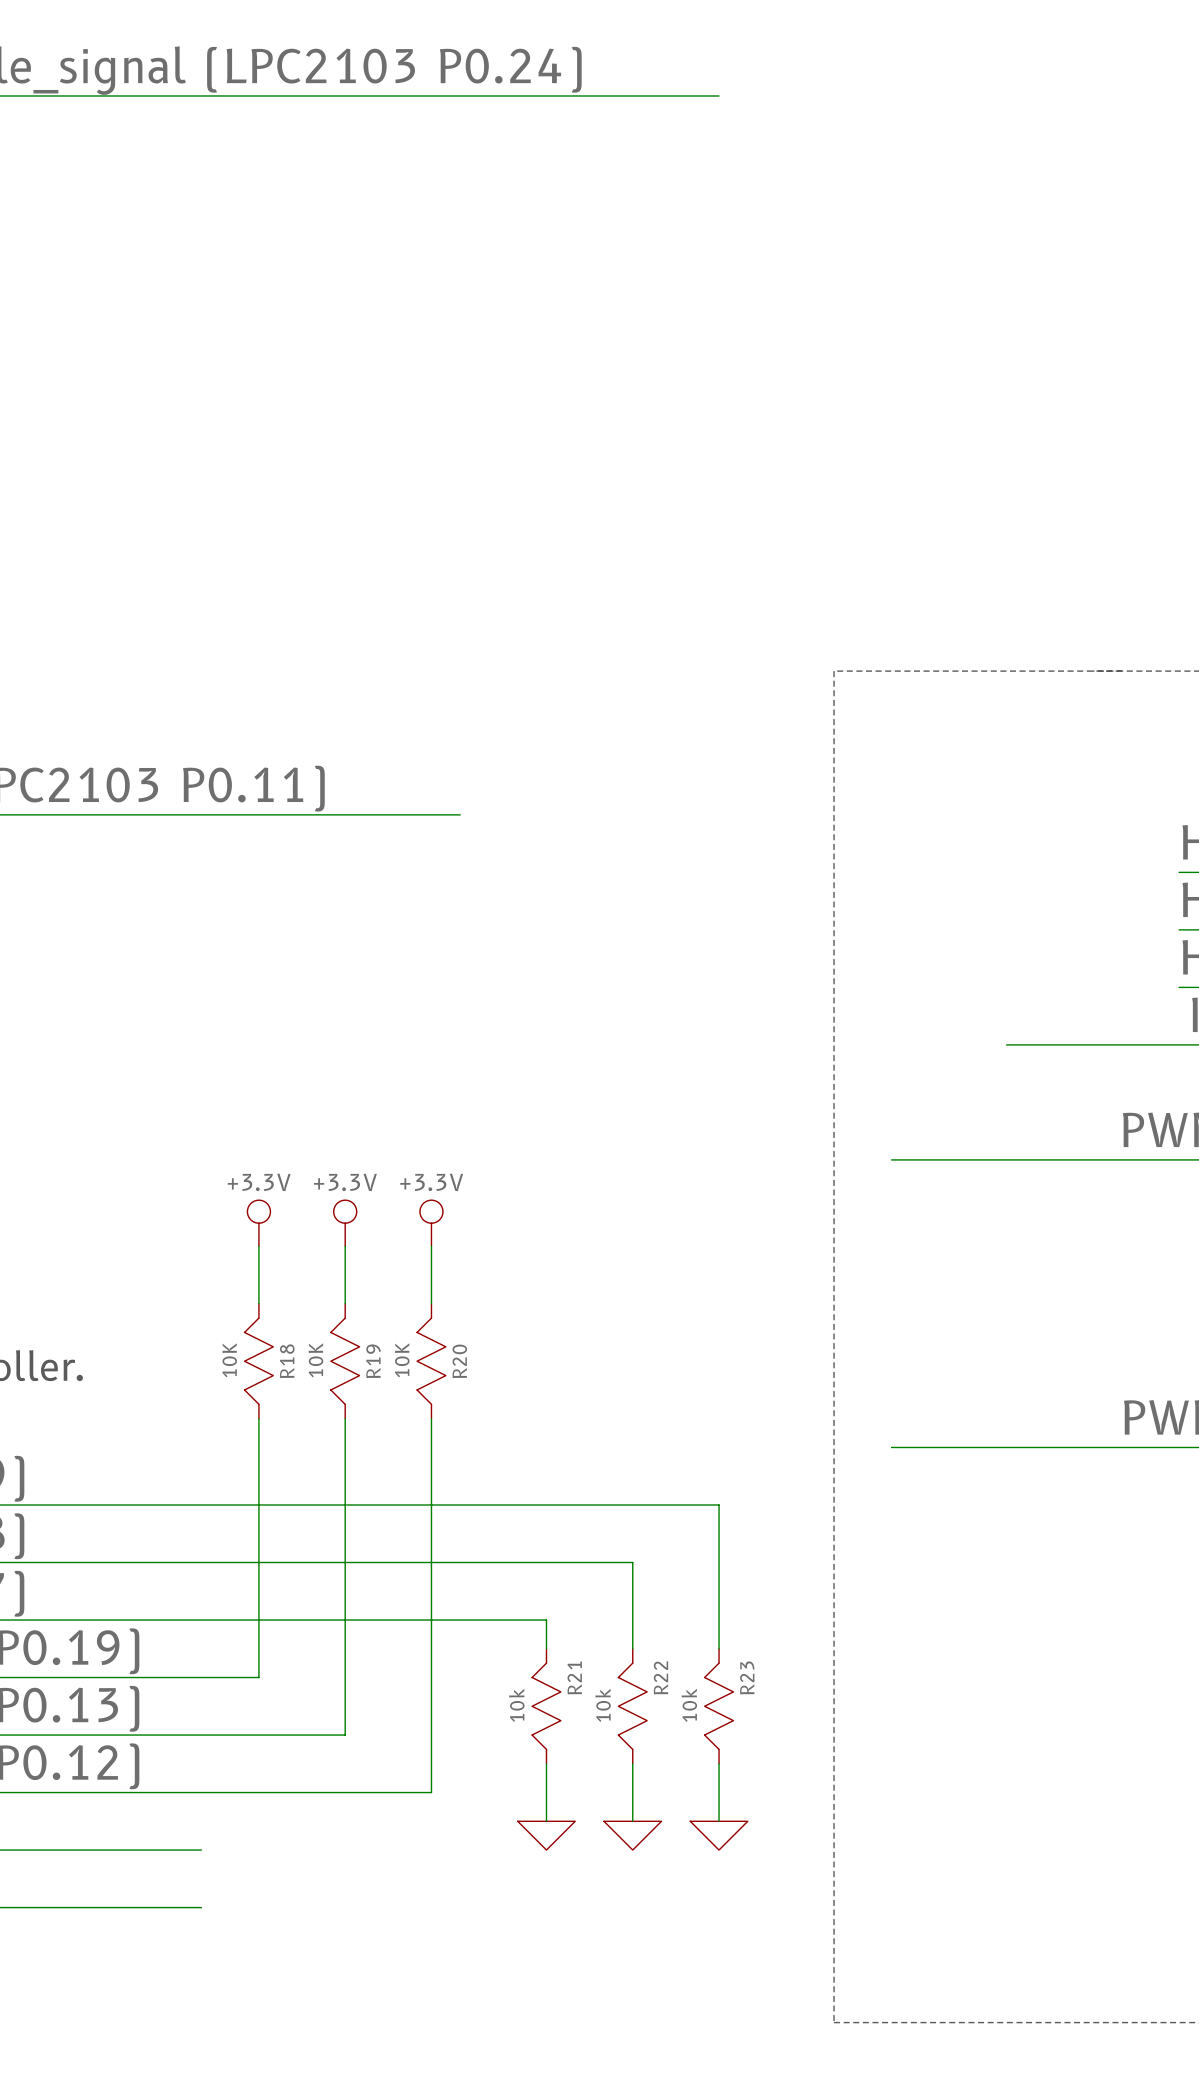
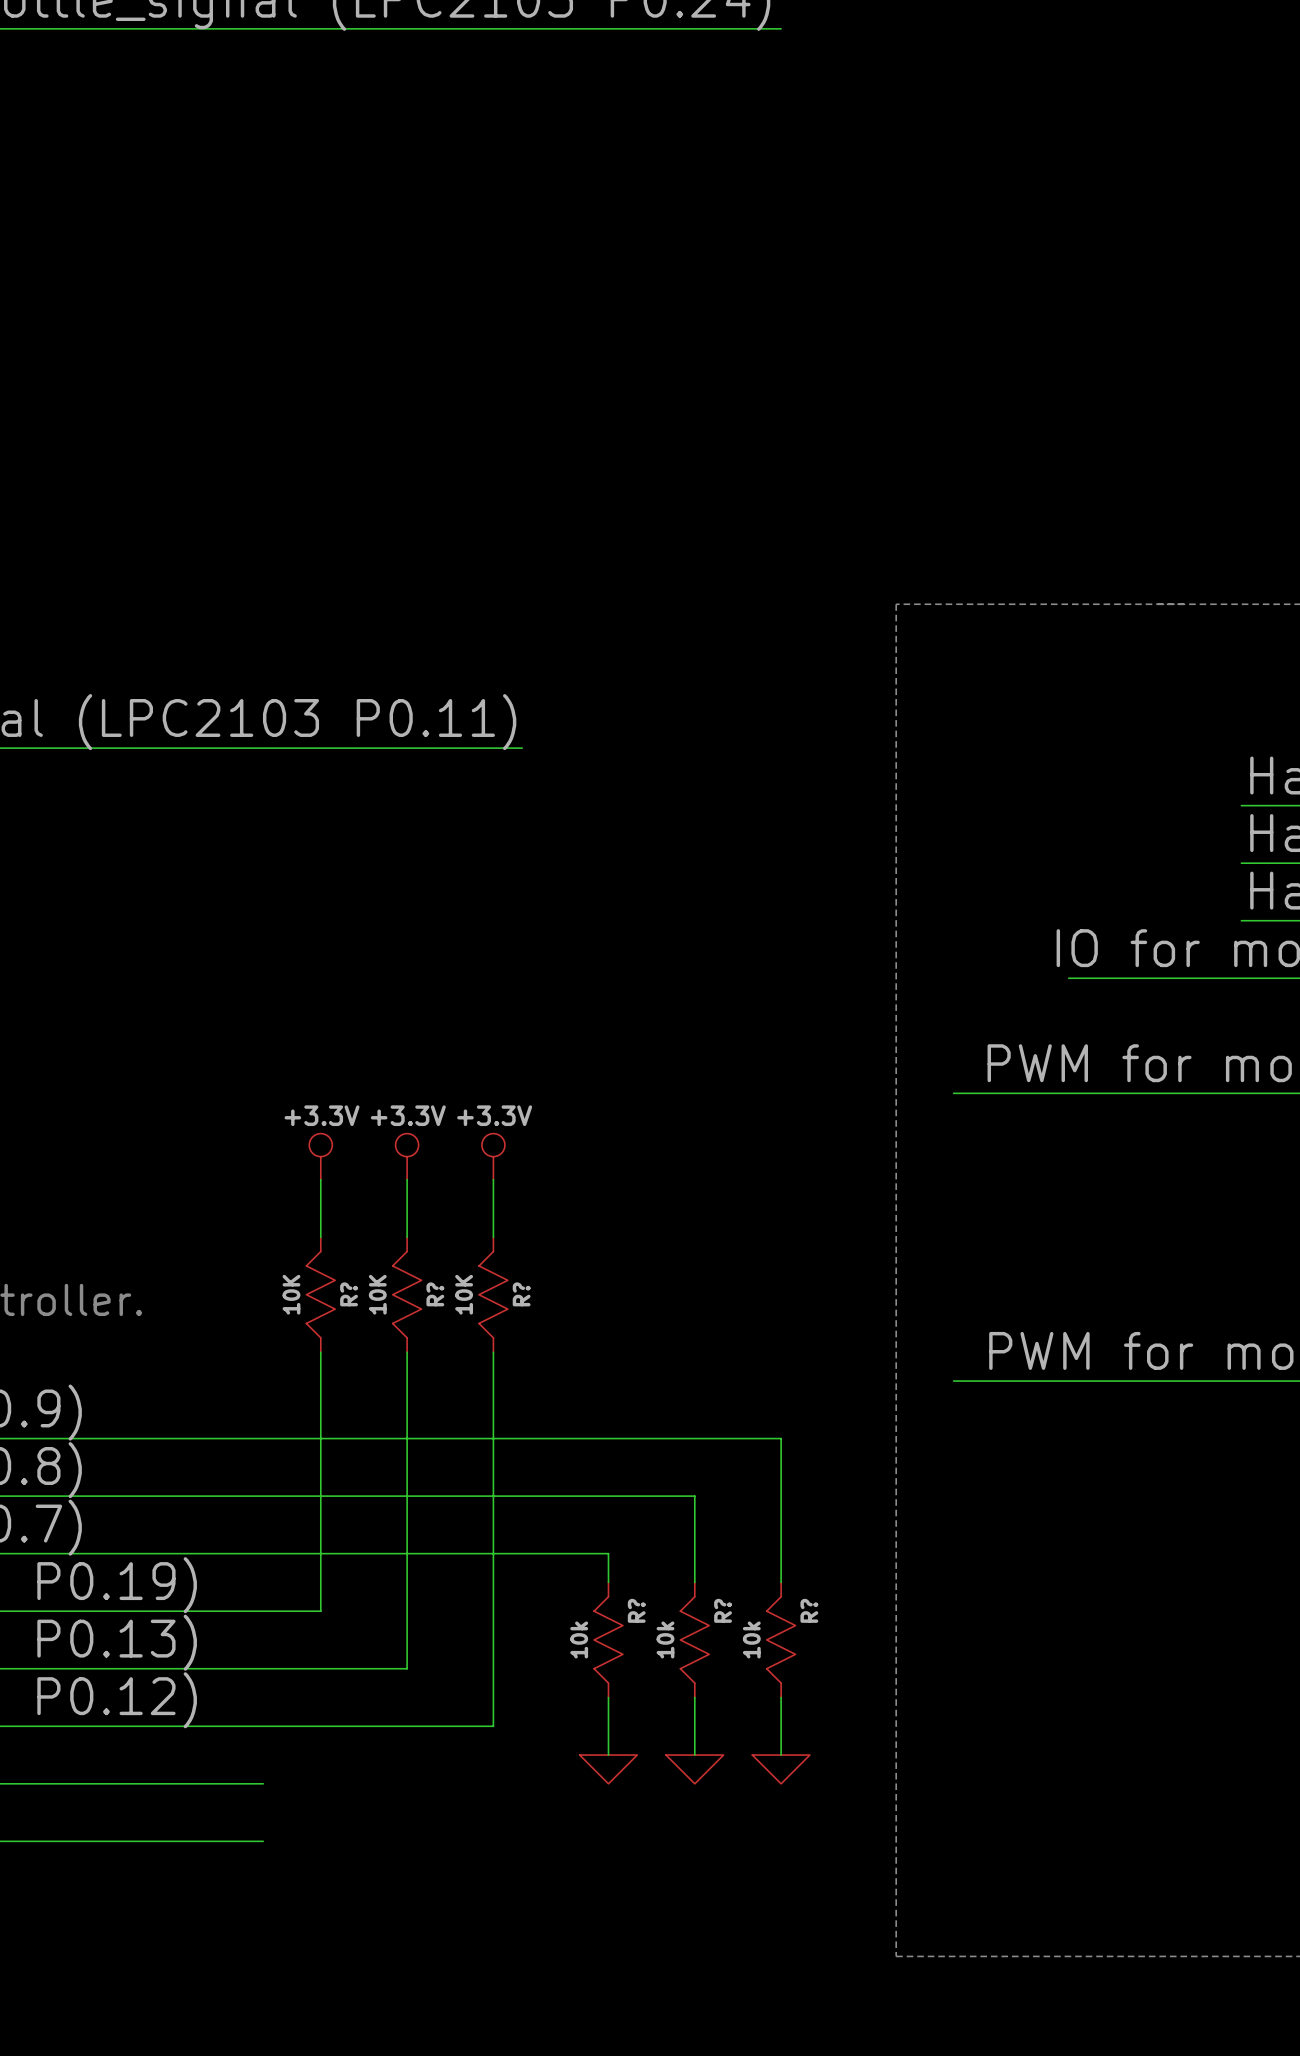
R18 name: R18 (287, 1361) -> R? (349, 1294)
R19 name: R19 (373, 1361) -> R? (435, 1294)
R20 name: R20 (459, 1361) -> R? (521, 1294)
R21 name: R21 (574, 1677) -> R? (636, 1610)
R22 name: R22 (660, 1677) -> R? (723, 1610)
R23 name: R23 (747, 1677) -> R? (809, 1610)

